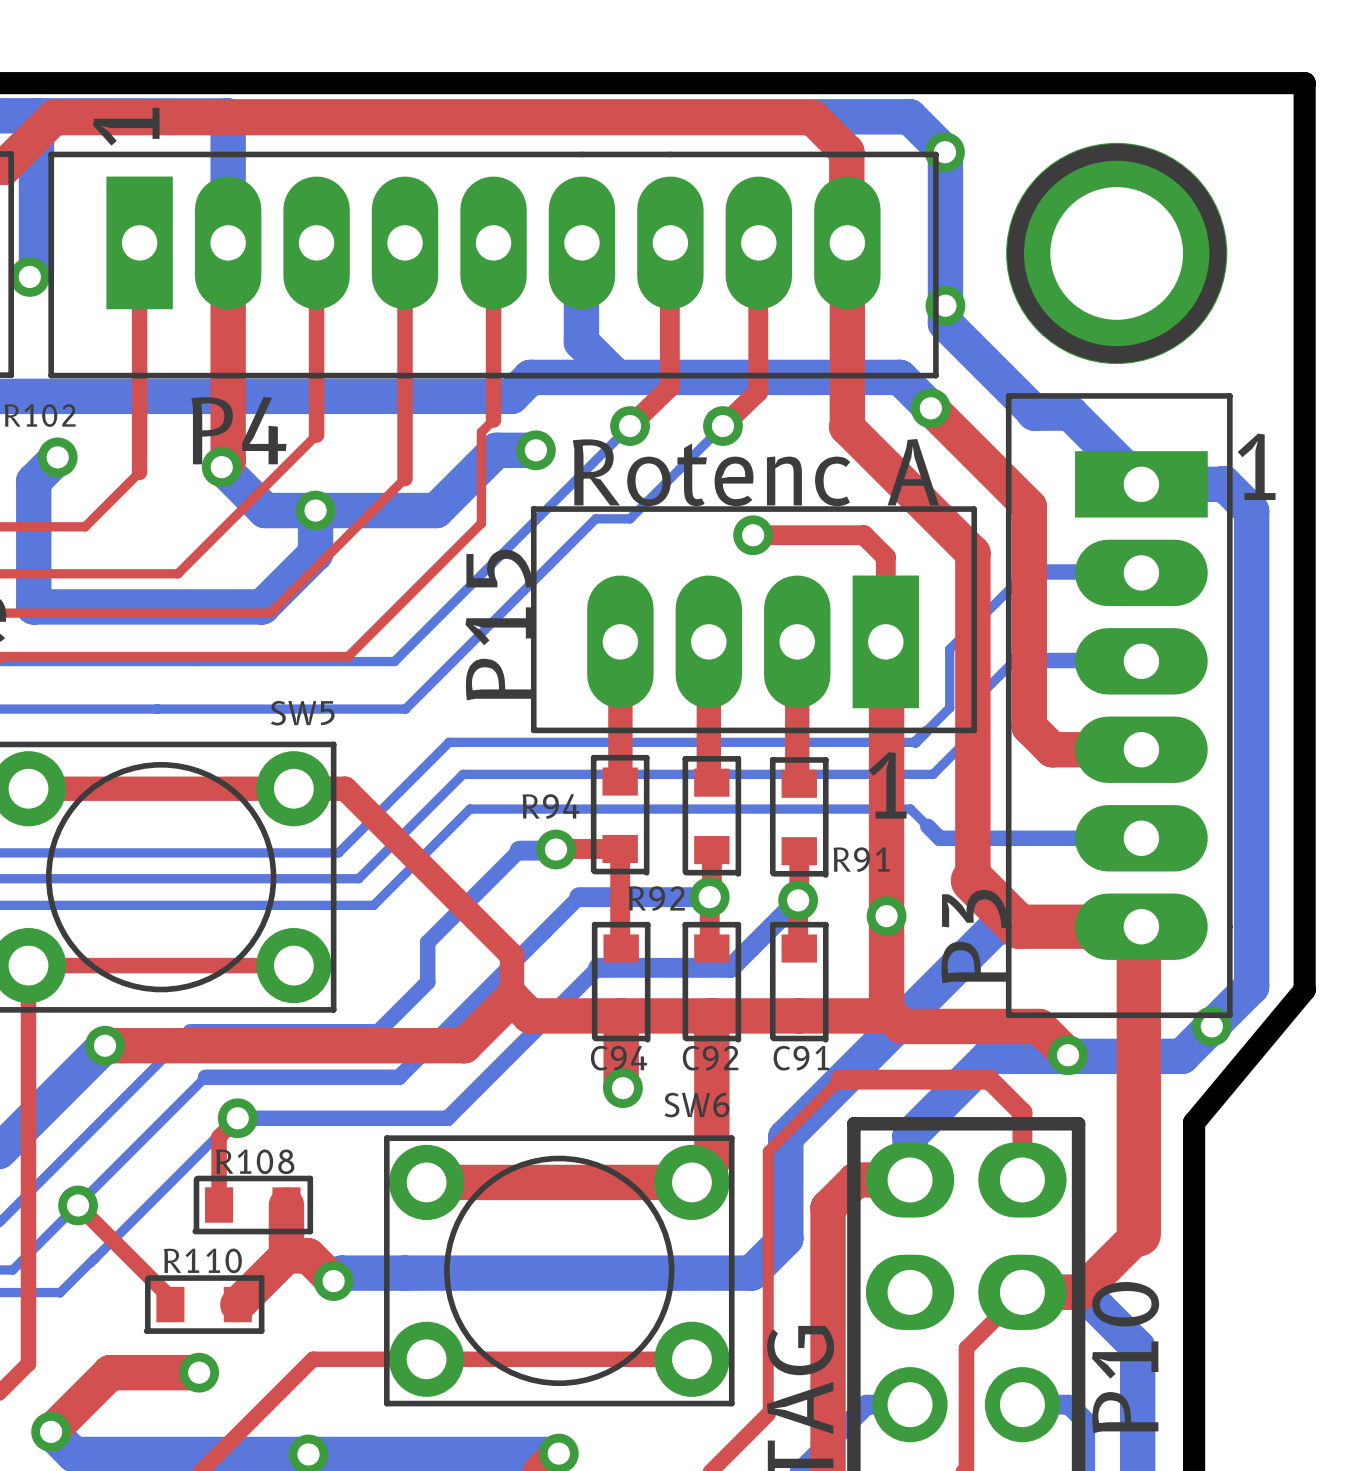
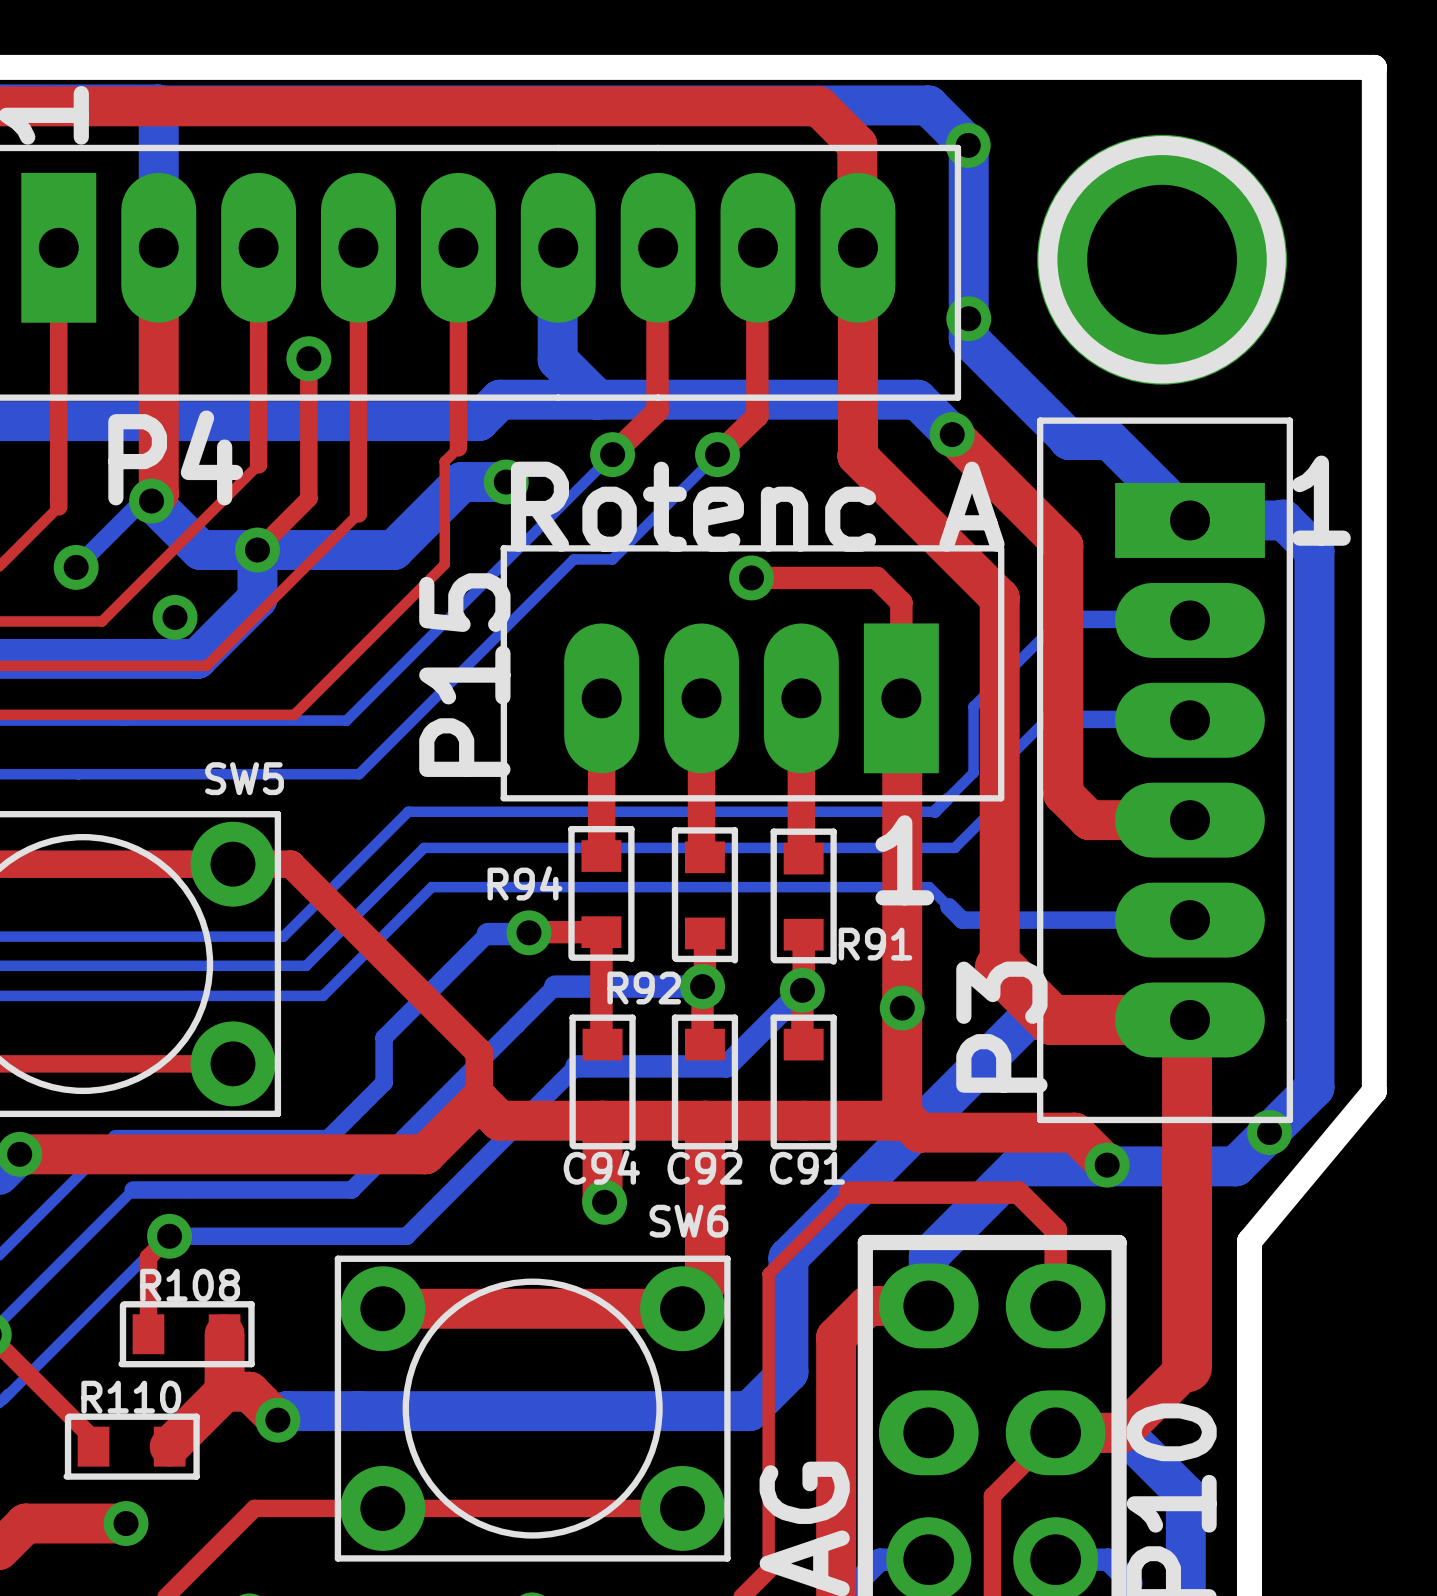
top track: none -> (308, 358) (308, 498) (257, 550)
via: none -> (308, 358)
bottom track: none -> (151, 501) (142, 501) (76, 567)
via: none -> (76, 567)
via: none -> (175, 617)

